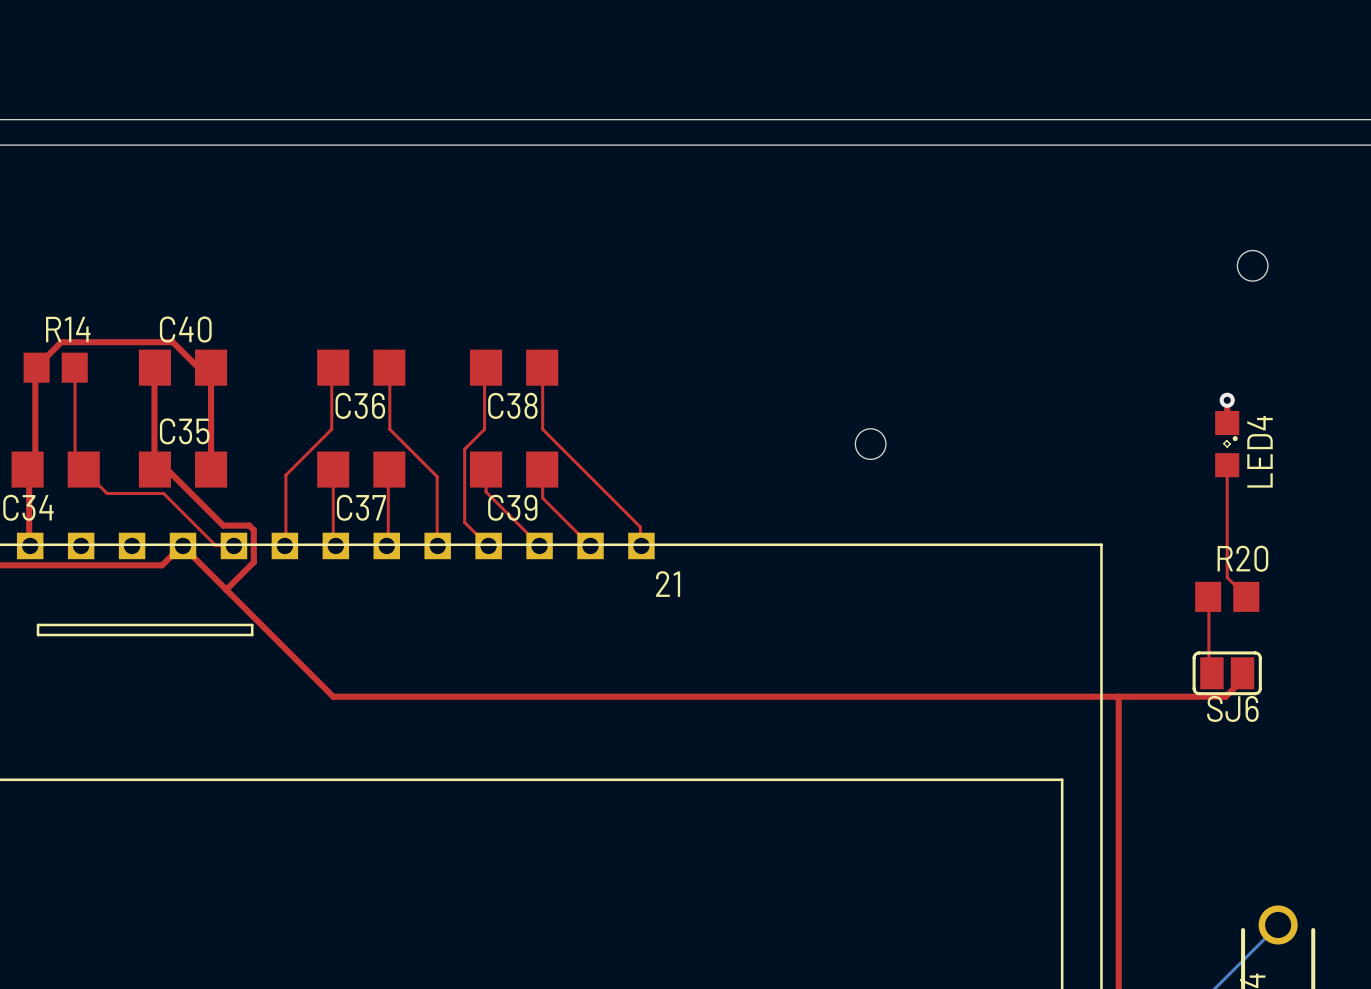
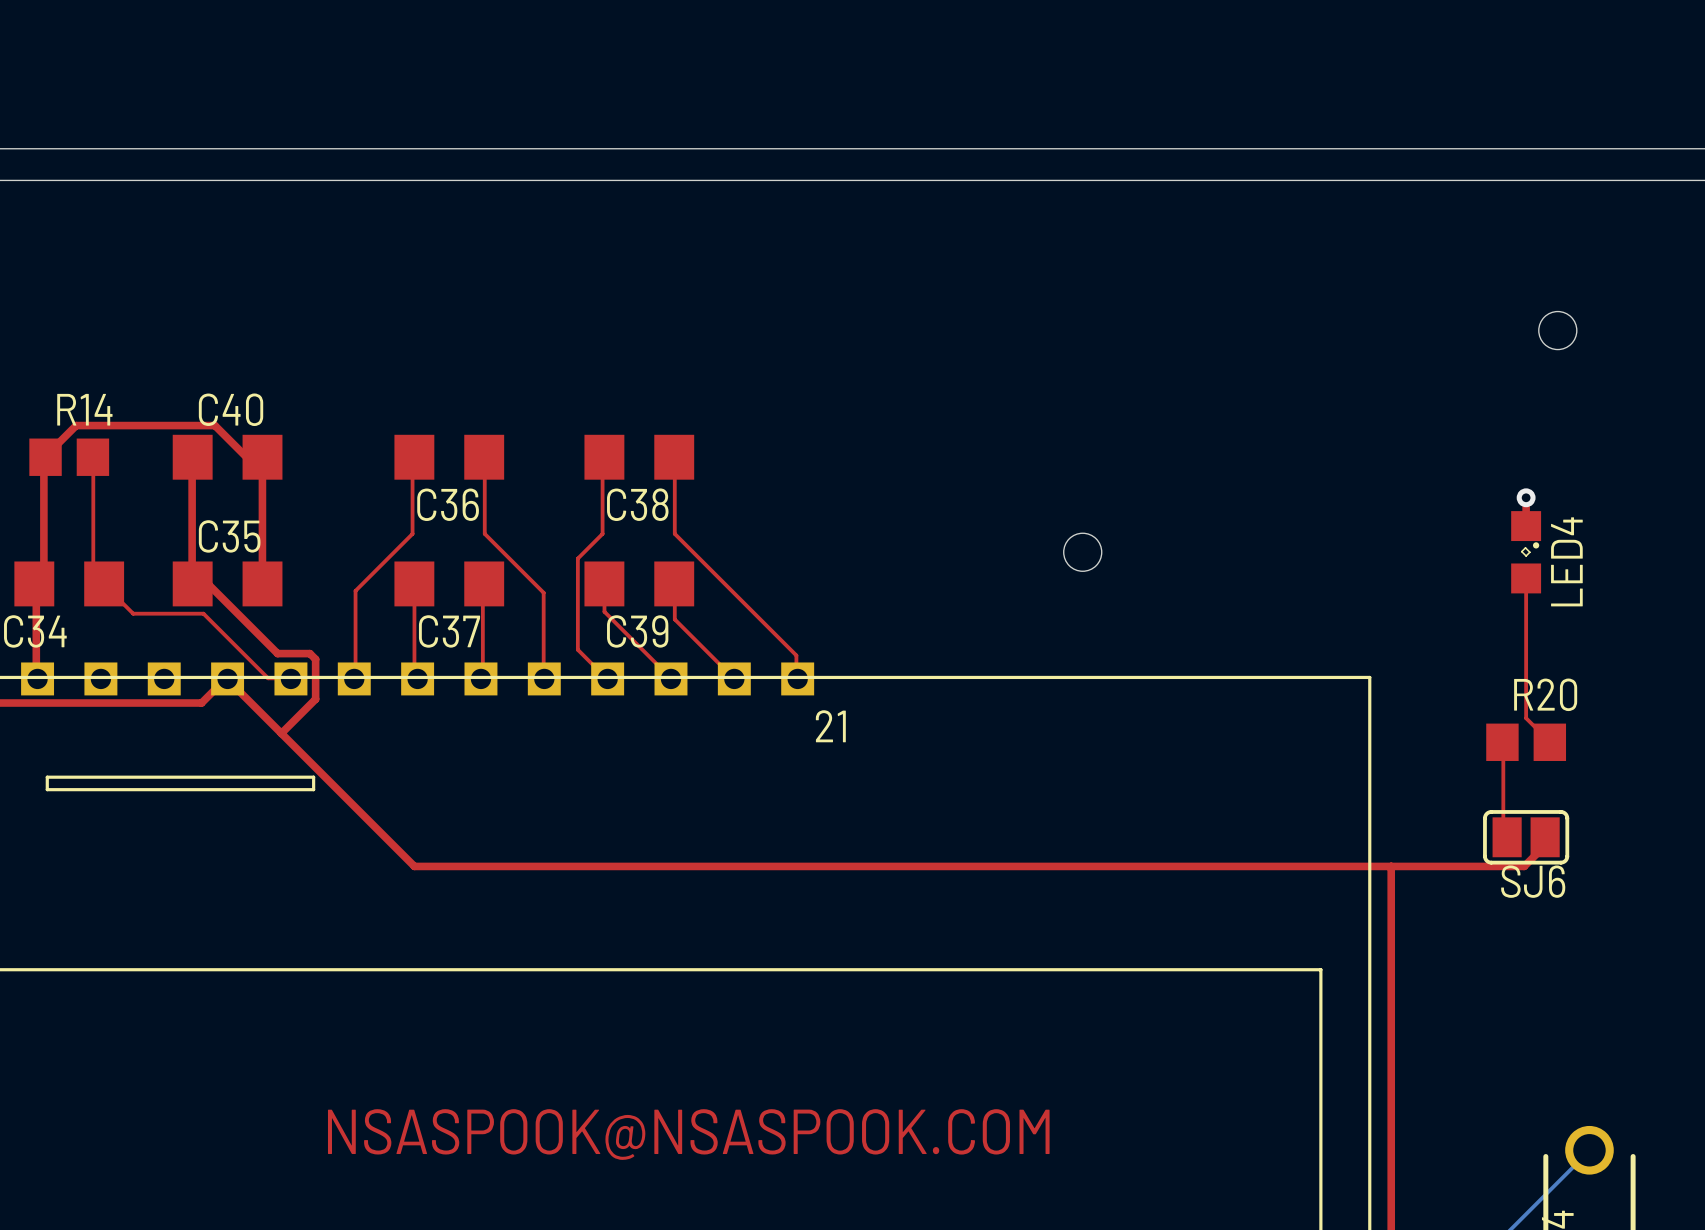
text: none -> NSASPOOK@NSASPOOK.COM (688, 1134)

